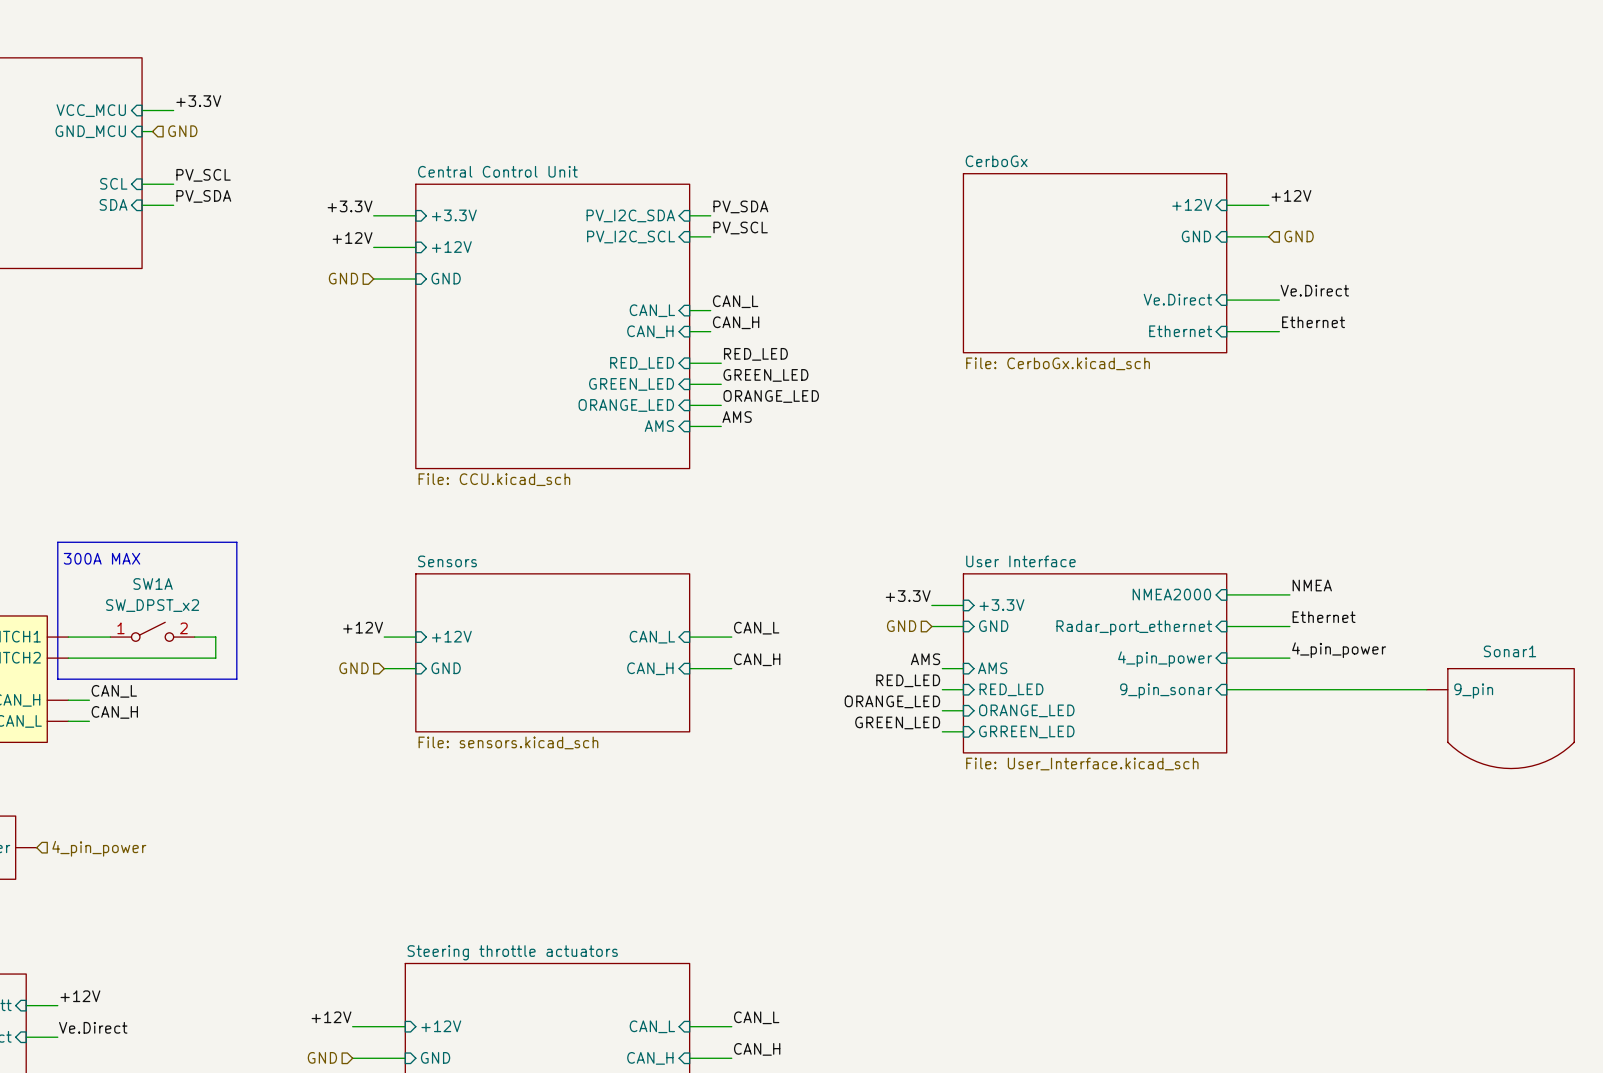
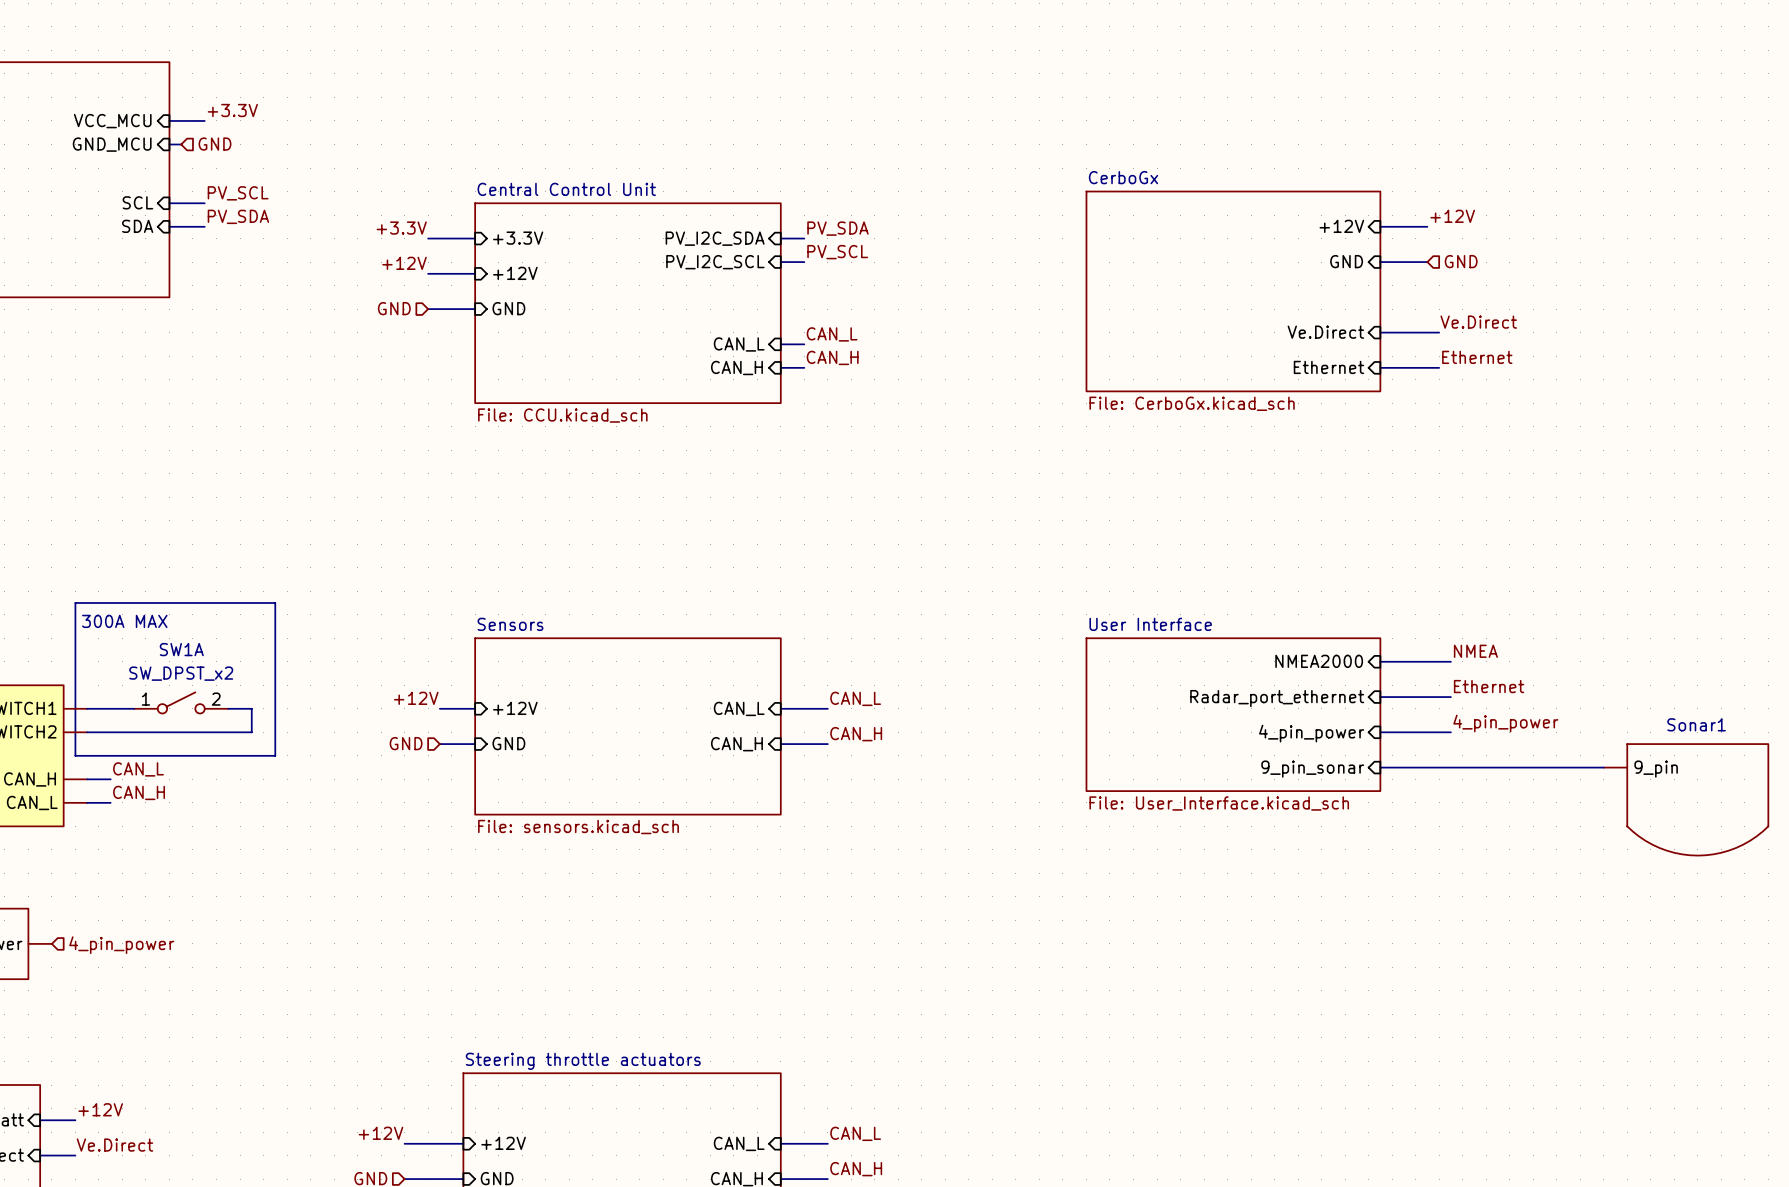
sheet Central Control Unit: none -> File: CCU.kicad_sch (627, 303)
sheet Central Control Unit: File: CCU.kicad_sch (552, 326) -> none
label: RED_LED (755, 354) -> none
sheet pin: RED_LED (642, 363) -> none
wire: (689, 363) (721, 363) -> none
label: GREEN_LED (765, 375) -> none
sheet pin: GREEN_LED (631, 384) -> none
wire: (689, 384) (721, 384) -> none
label: ORANGE_LED (771, 396) -> none
sheet pin: ORANGE_LED (626, 405) -> none
wire: (689, 405) (721, 405) -> none
label: AMS (737, 417) -> none
sheet pin: AMS (659, 426) -> none
wire: (689, 426) (721, 426) -> none
label: +3.3V (908, 596) -> none
wire: (931, 605) (963, 605) -> none
sheet pin: +3.3V (1001, 605) -> none
hierarchical label: GND (901, 626) -> none
wire: (931, 626) (963, 626) -> none
sheet pin: GND (993, 626) -> none
sheet User Interface: none -> File: User_Interface.kicad_sch (1233, 714)
label: AMS (925, 659) -> none
sheet User Interface: File: User_Interface.kicad_sch (1095, 663) -> none
wire: (942, 668) (963, 668) -> none
sheet pin: AMS (992, 668) -> none
label: RED_LED (908, 680) -> none
wire: (942, 689) (963, 689) -> none
sheet pin: RED_LED (1011, 689) -> none
label: ORANGE_LED (892, 701) -> none
wire: (942, 710) (963, 710) -> none
sheet pin: ORANGE_LED (1026, 710) -> none
label: GREEN_LED (897, 722) -> none
wire: (942, 731) (963, 731) -> none
sheet pin: GRREEN_LED (1026, 731) -> none

